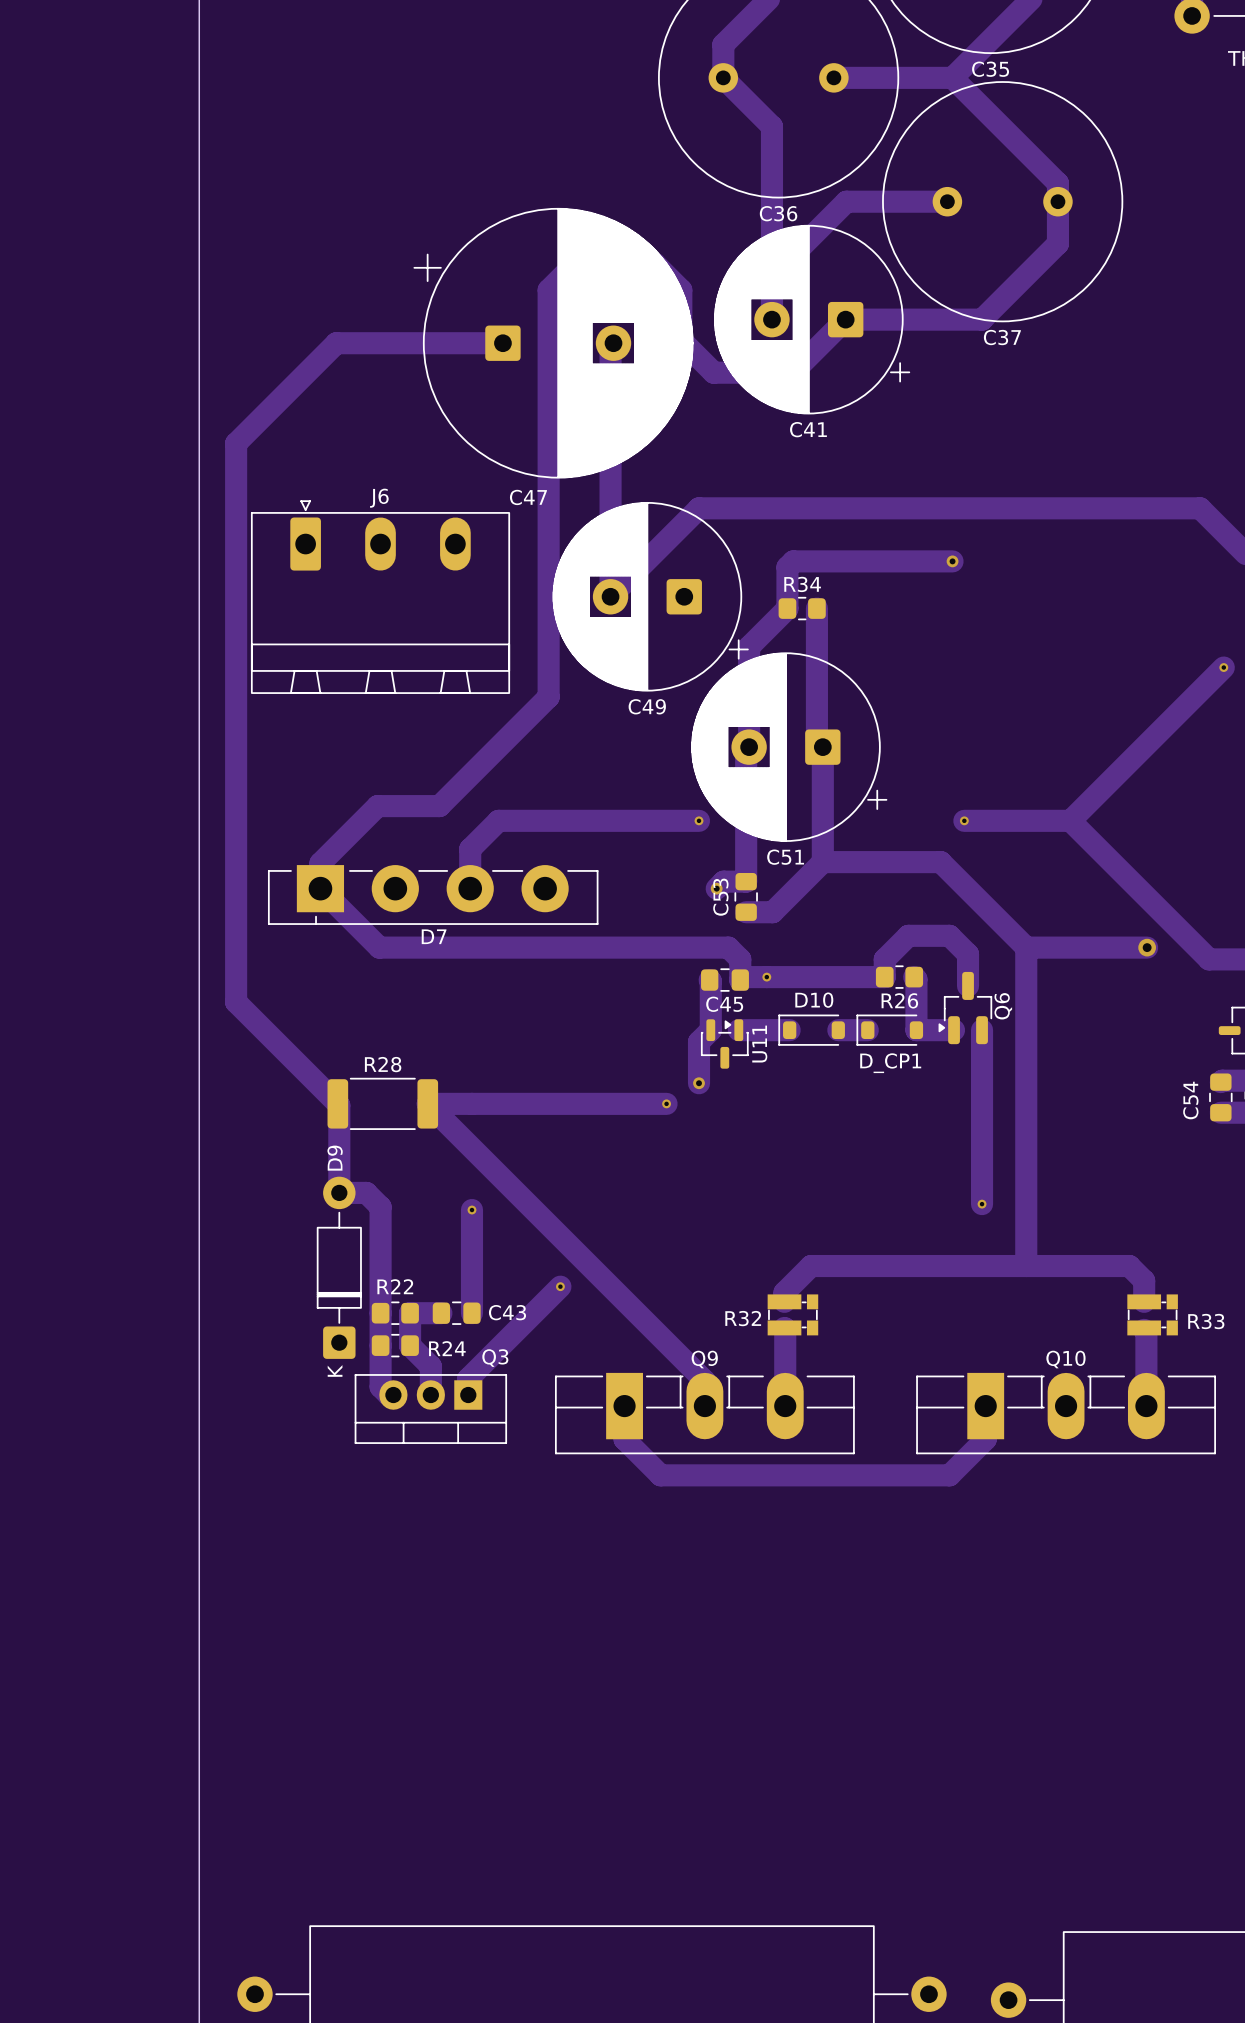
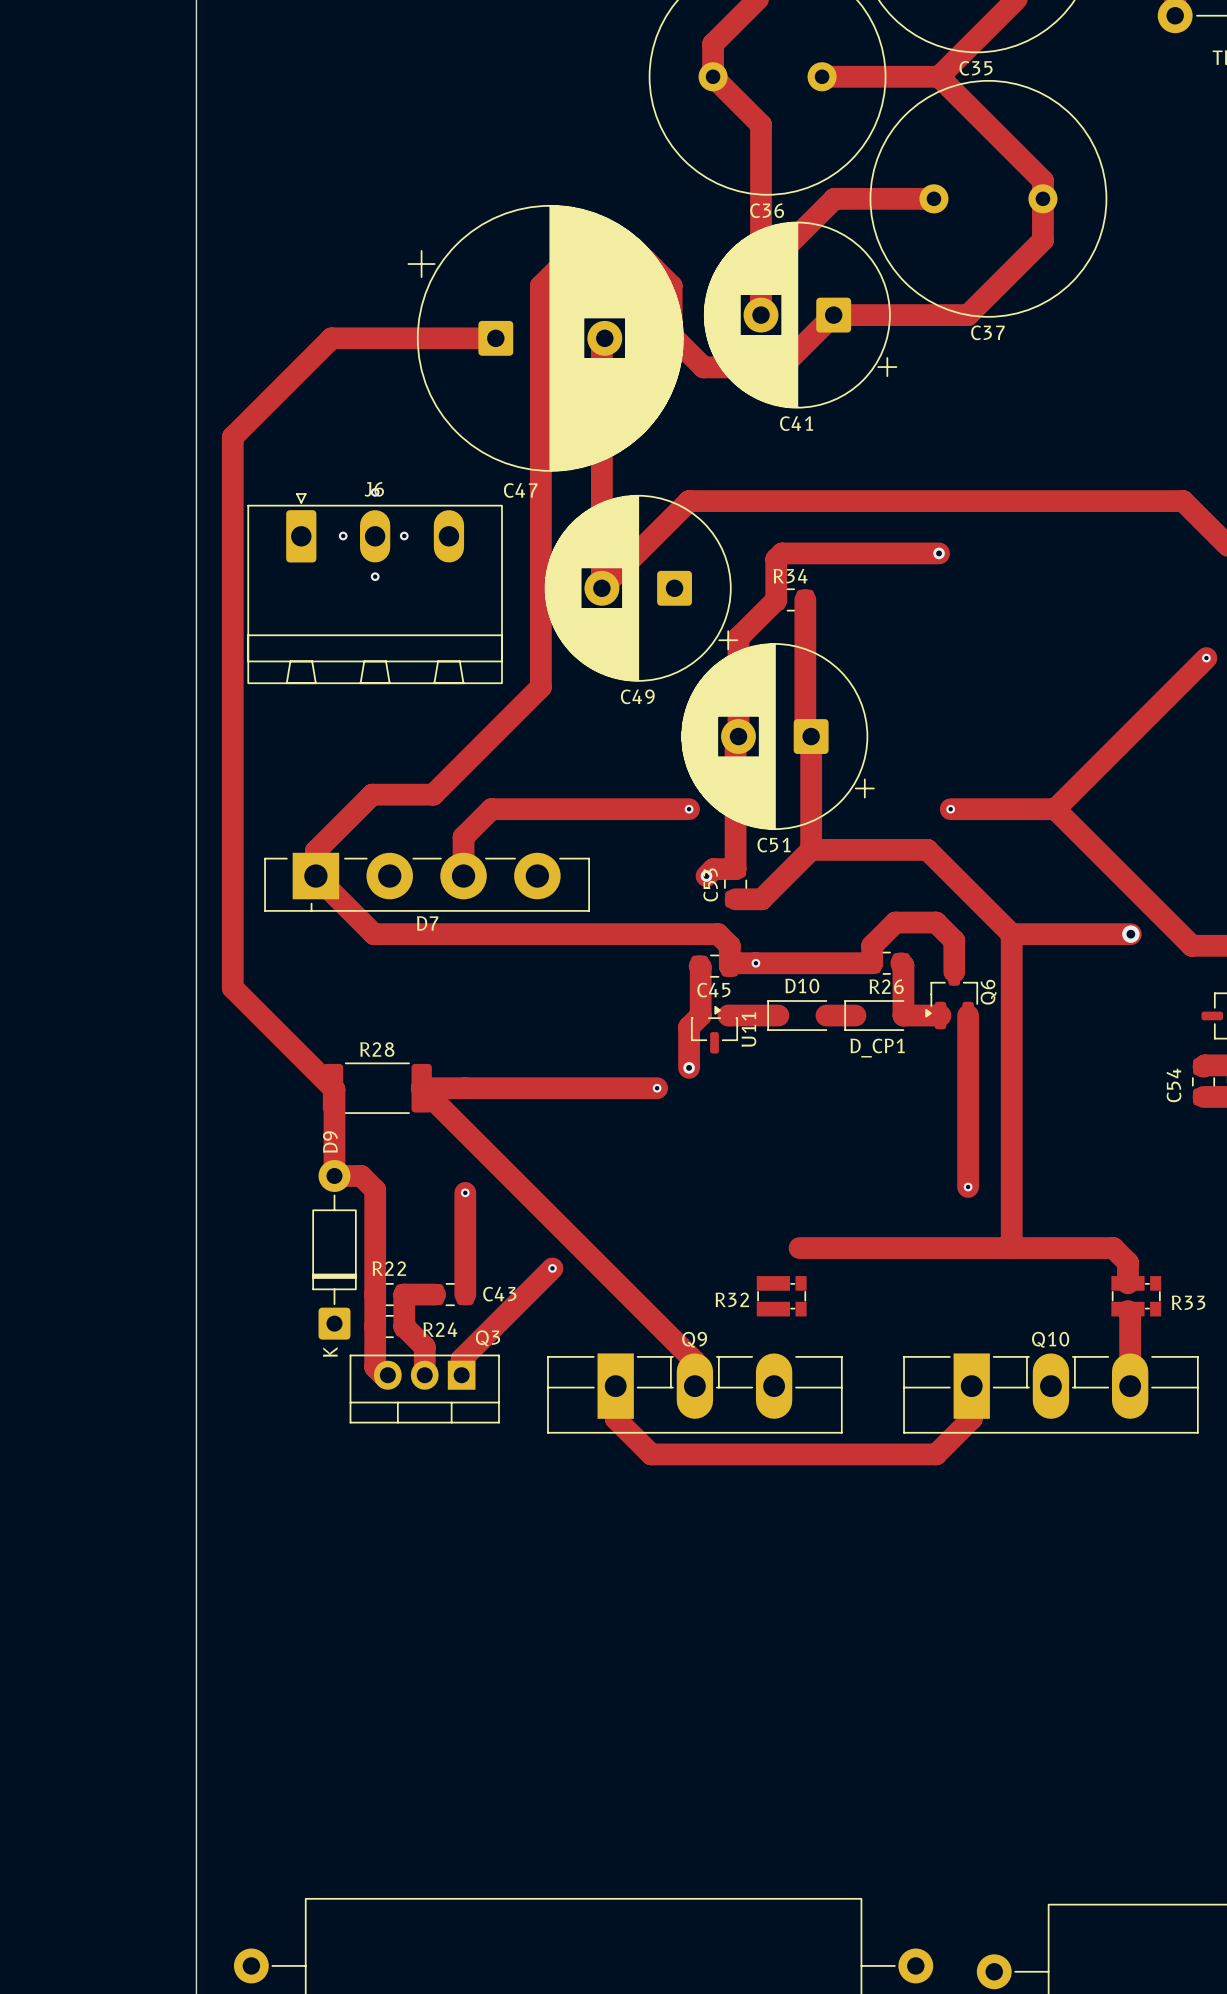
via: none -> (375, 492)
via: none -> (343, 535)
via: none -> (404, 535)
via: none -> (375, 576)
track: (811, 1266) (784, 1292) (784, 1301) -> none
track: (784, 1327) (785, 1406) -> none

